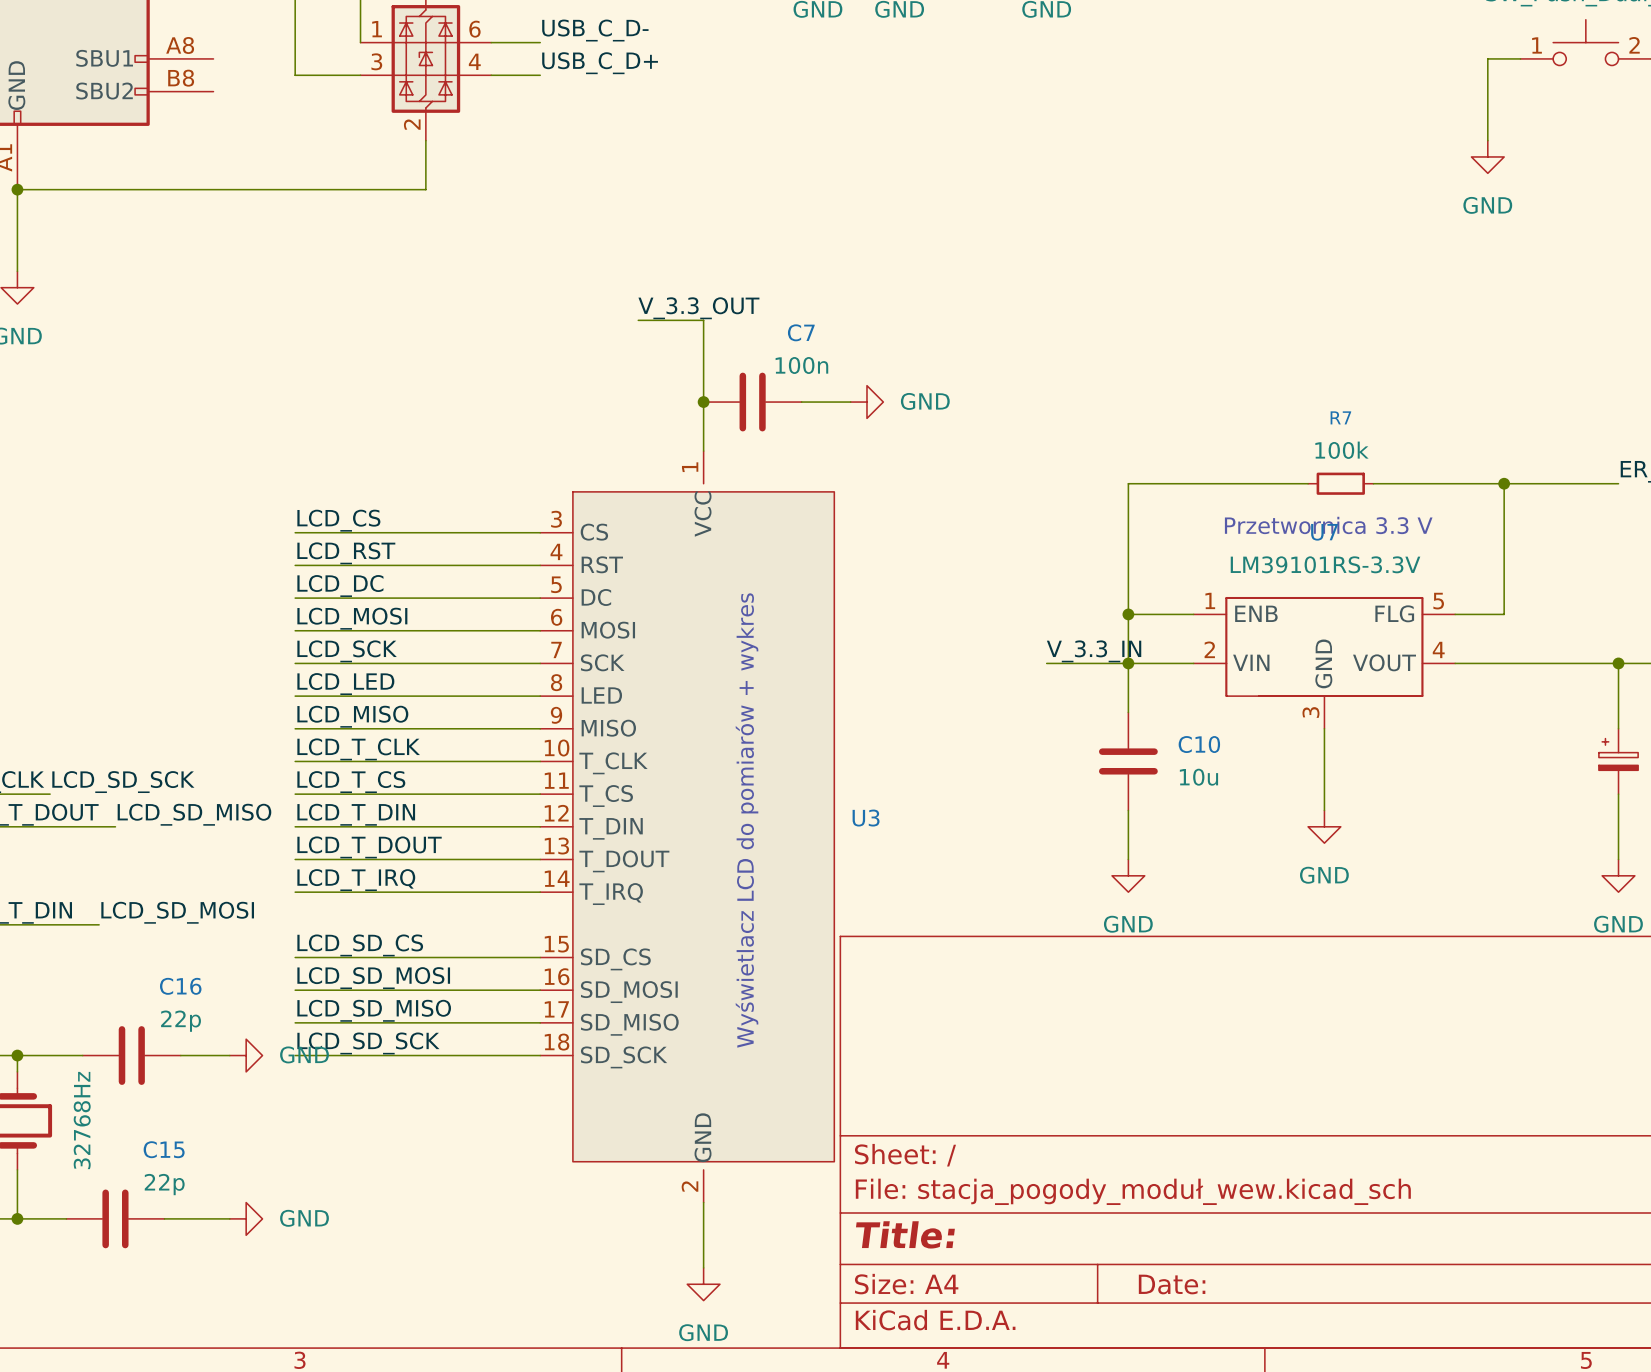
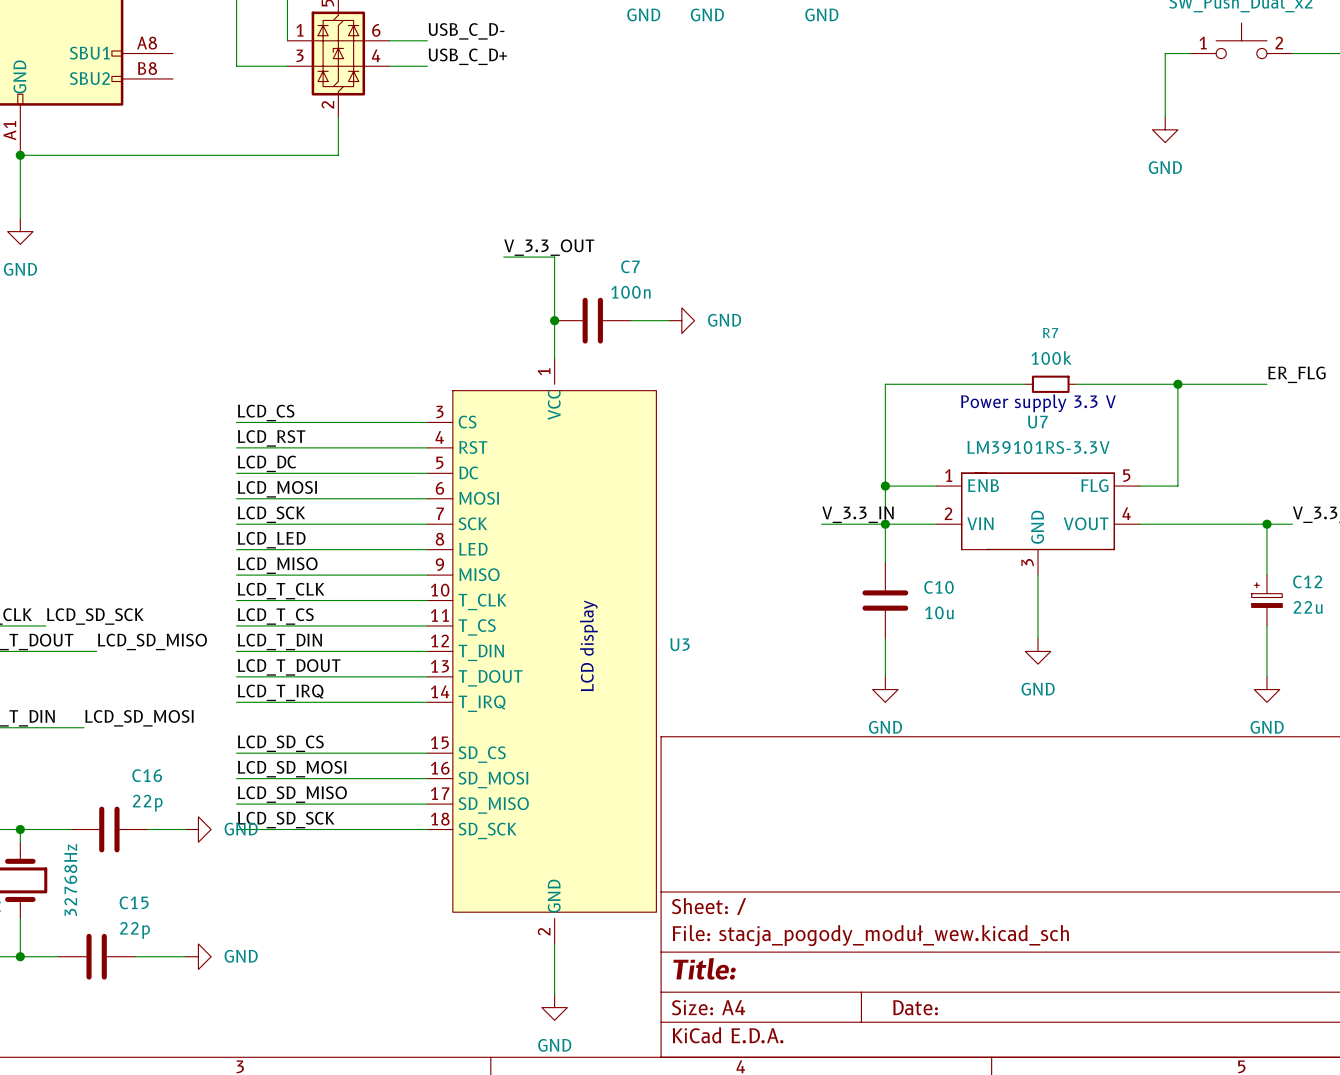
text: none -> Power supply 3.3 V (1038, 403)
text: Przetwornica 3.3 V (1328, 525) -> none
text: Wyświetlacz LCD do pomiarów + wykres (747, 820) -> LCD display (588, 645)

